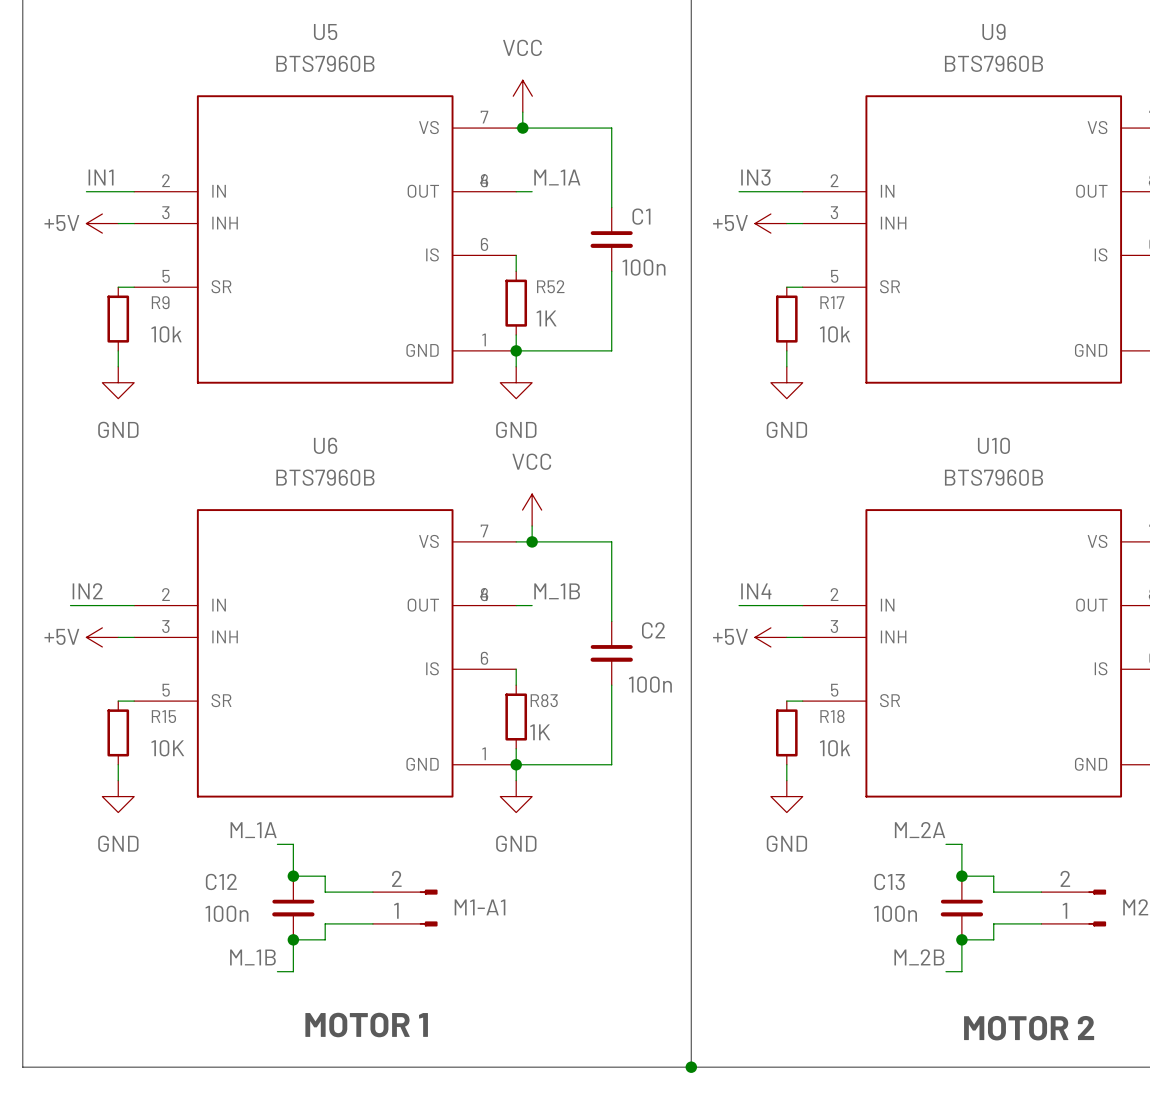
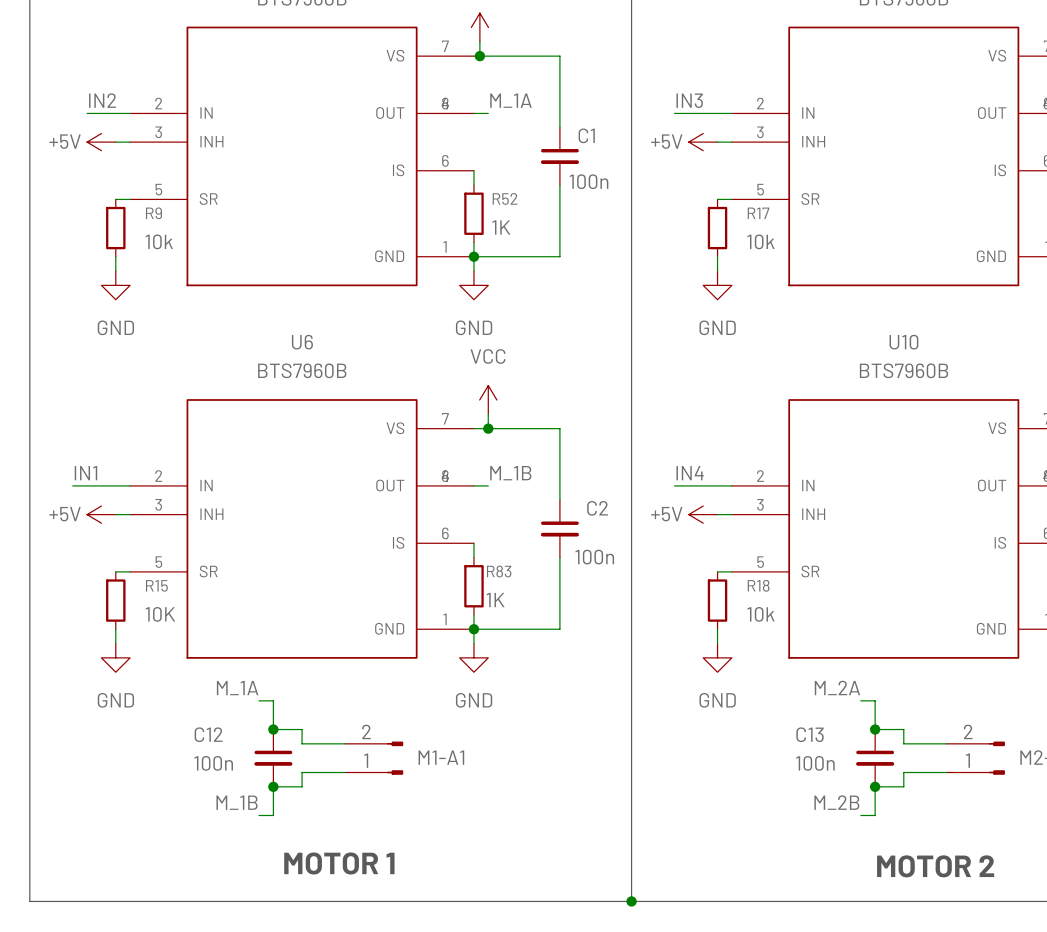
label: IN1 (101, 177) -> IN2 (102, 100)
label: IN2 (87, 591) -> IN1 (85, 473)

